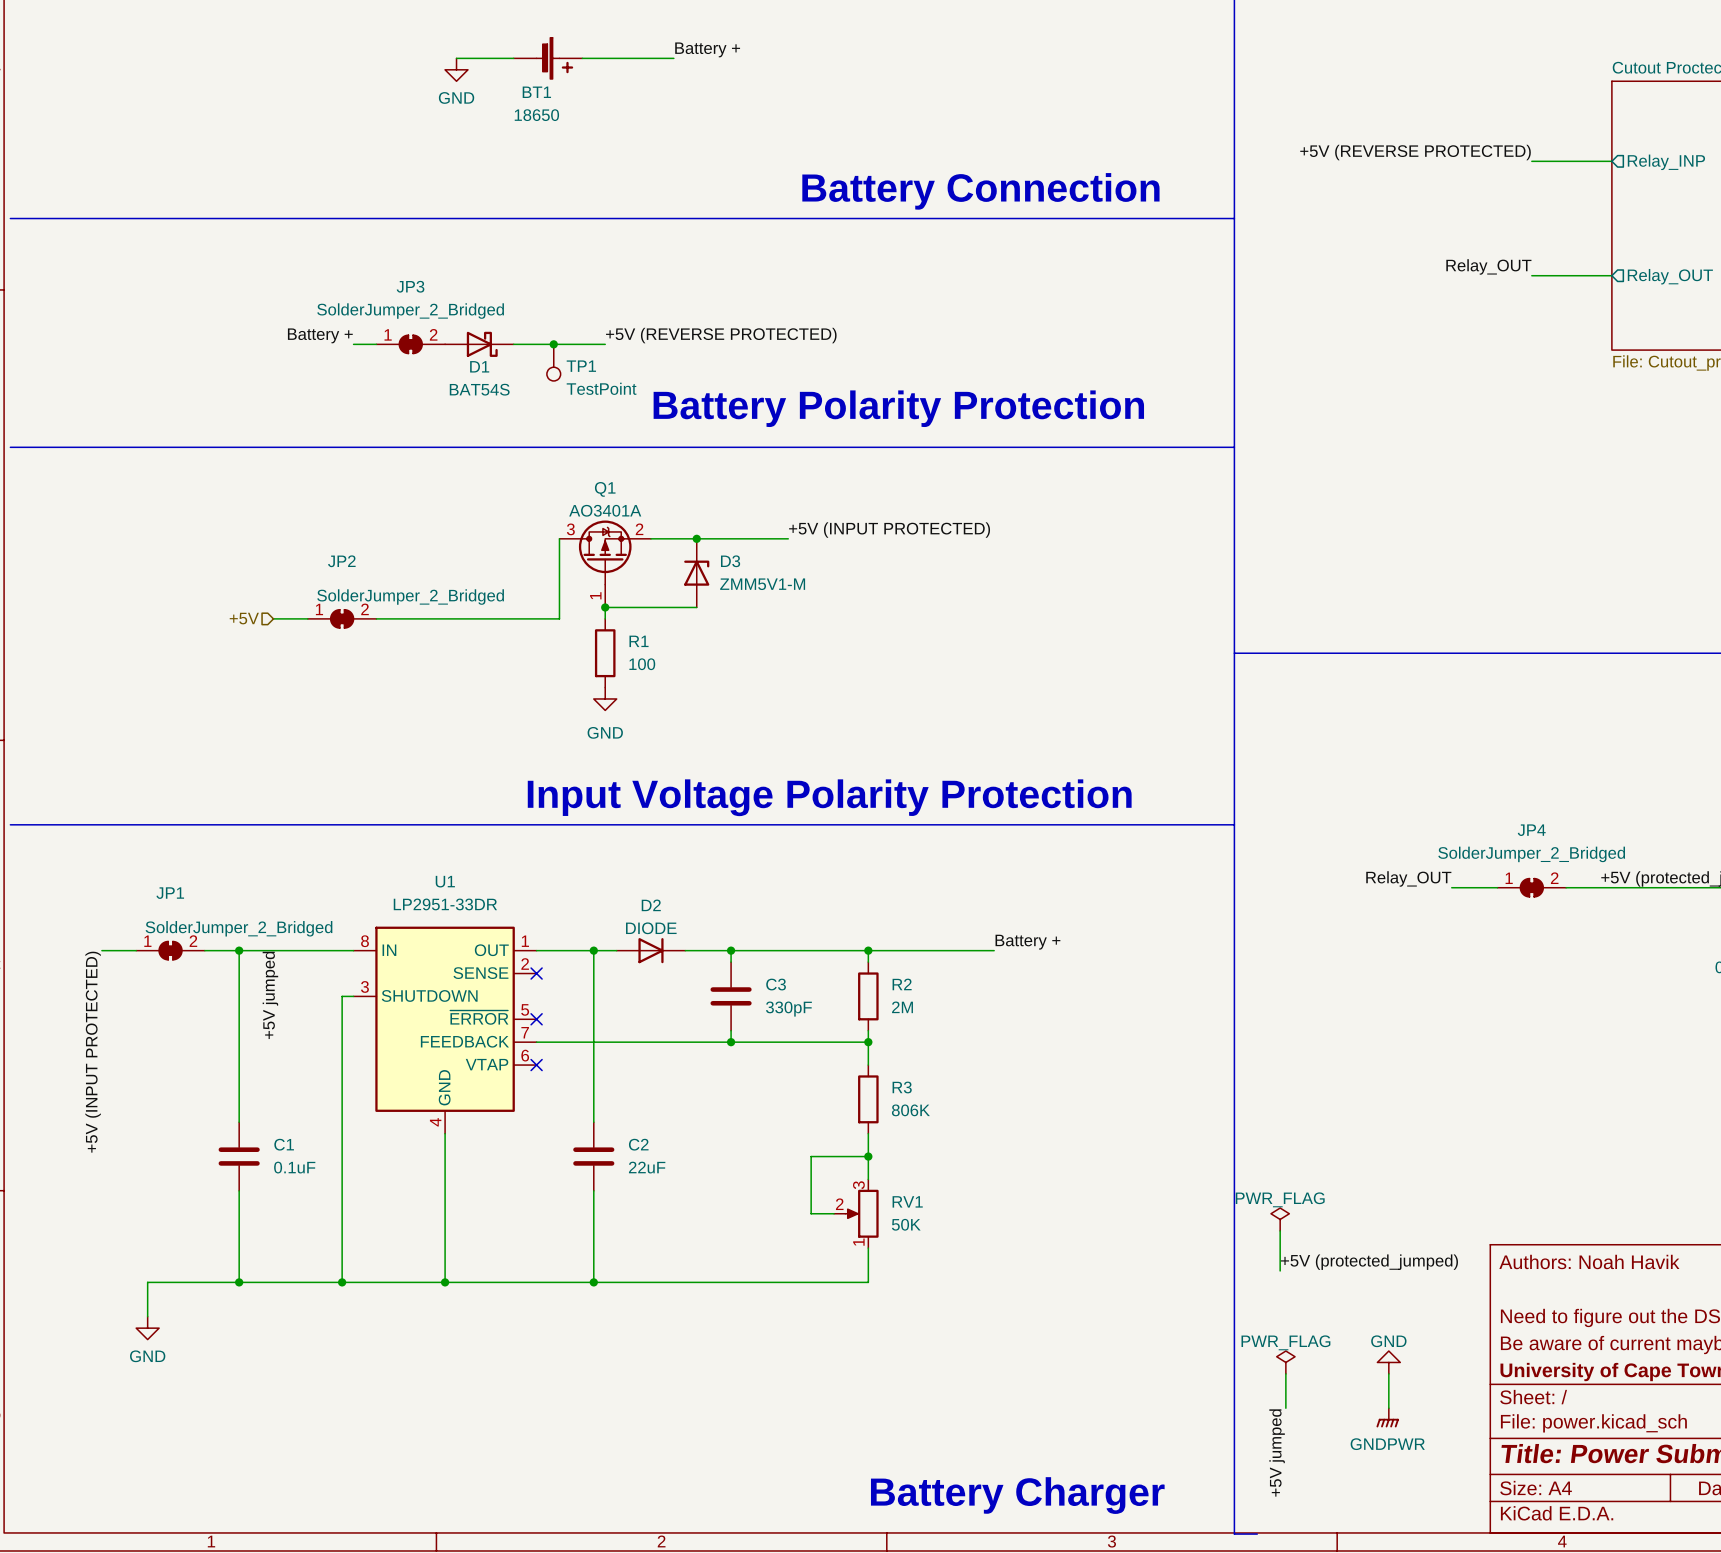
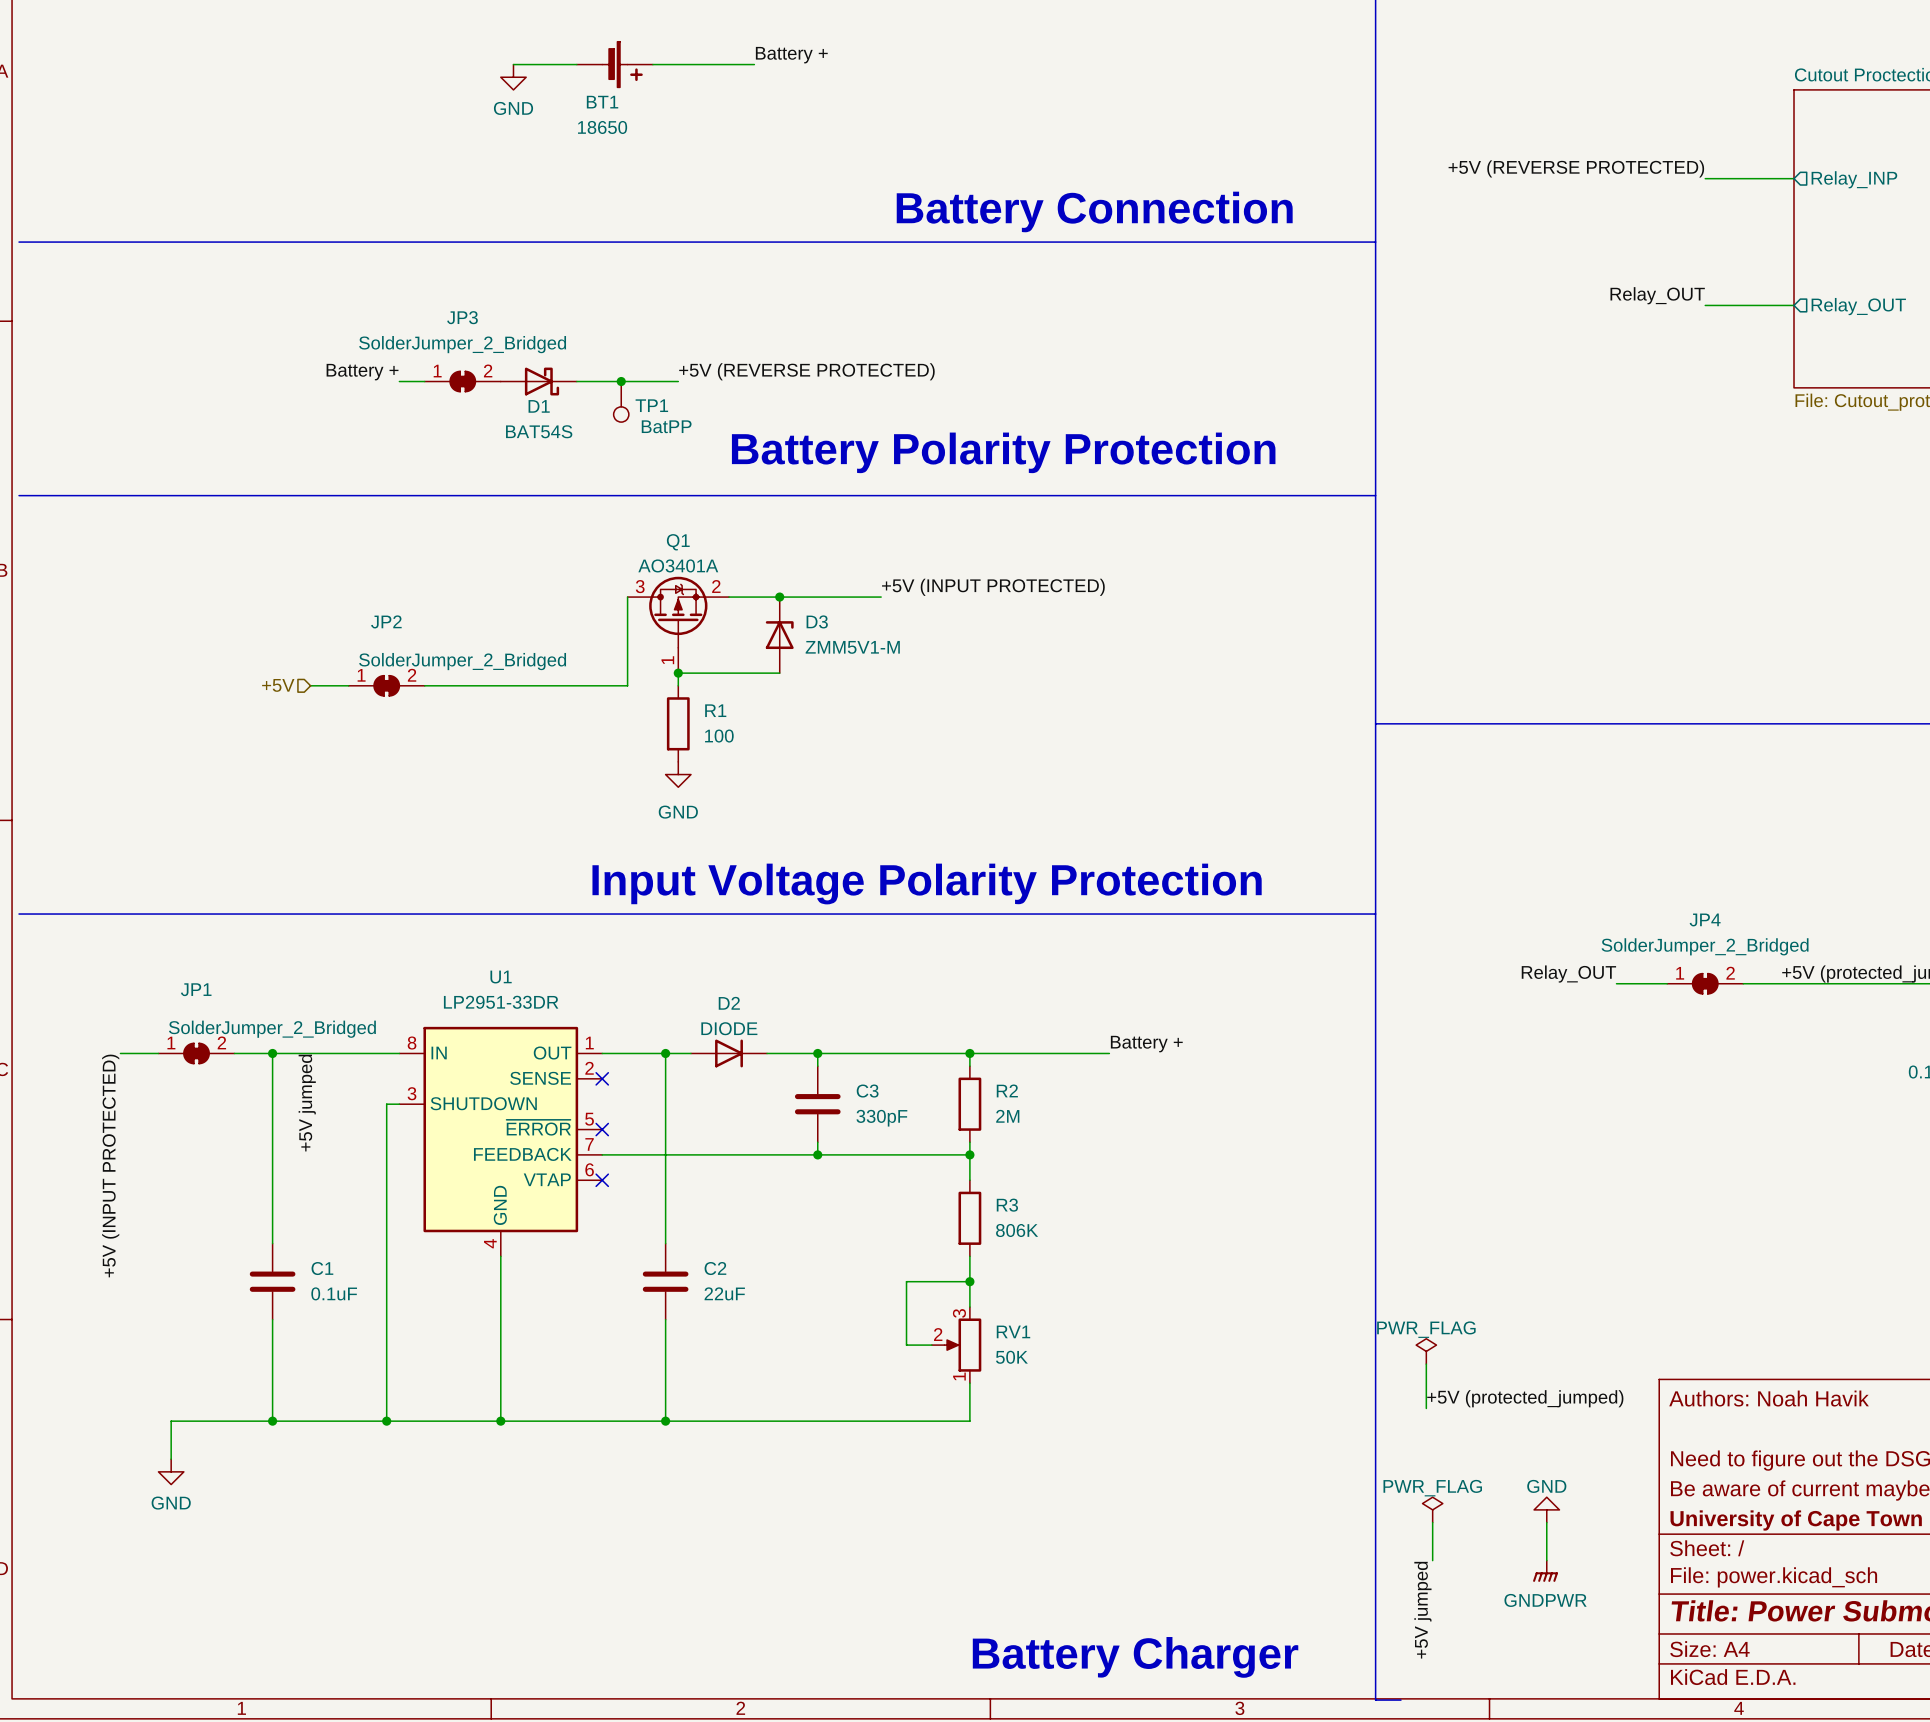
TP1 value: TestPoint (601, 388) -> BatPP (666, 426)

